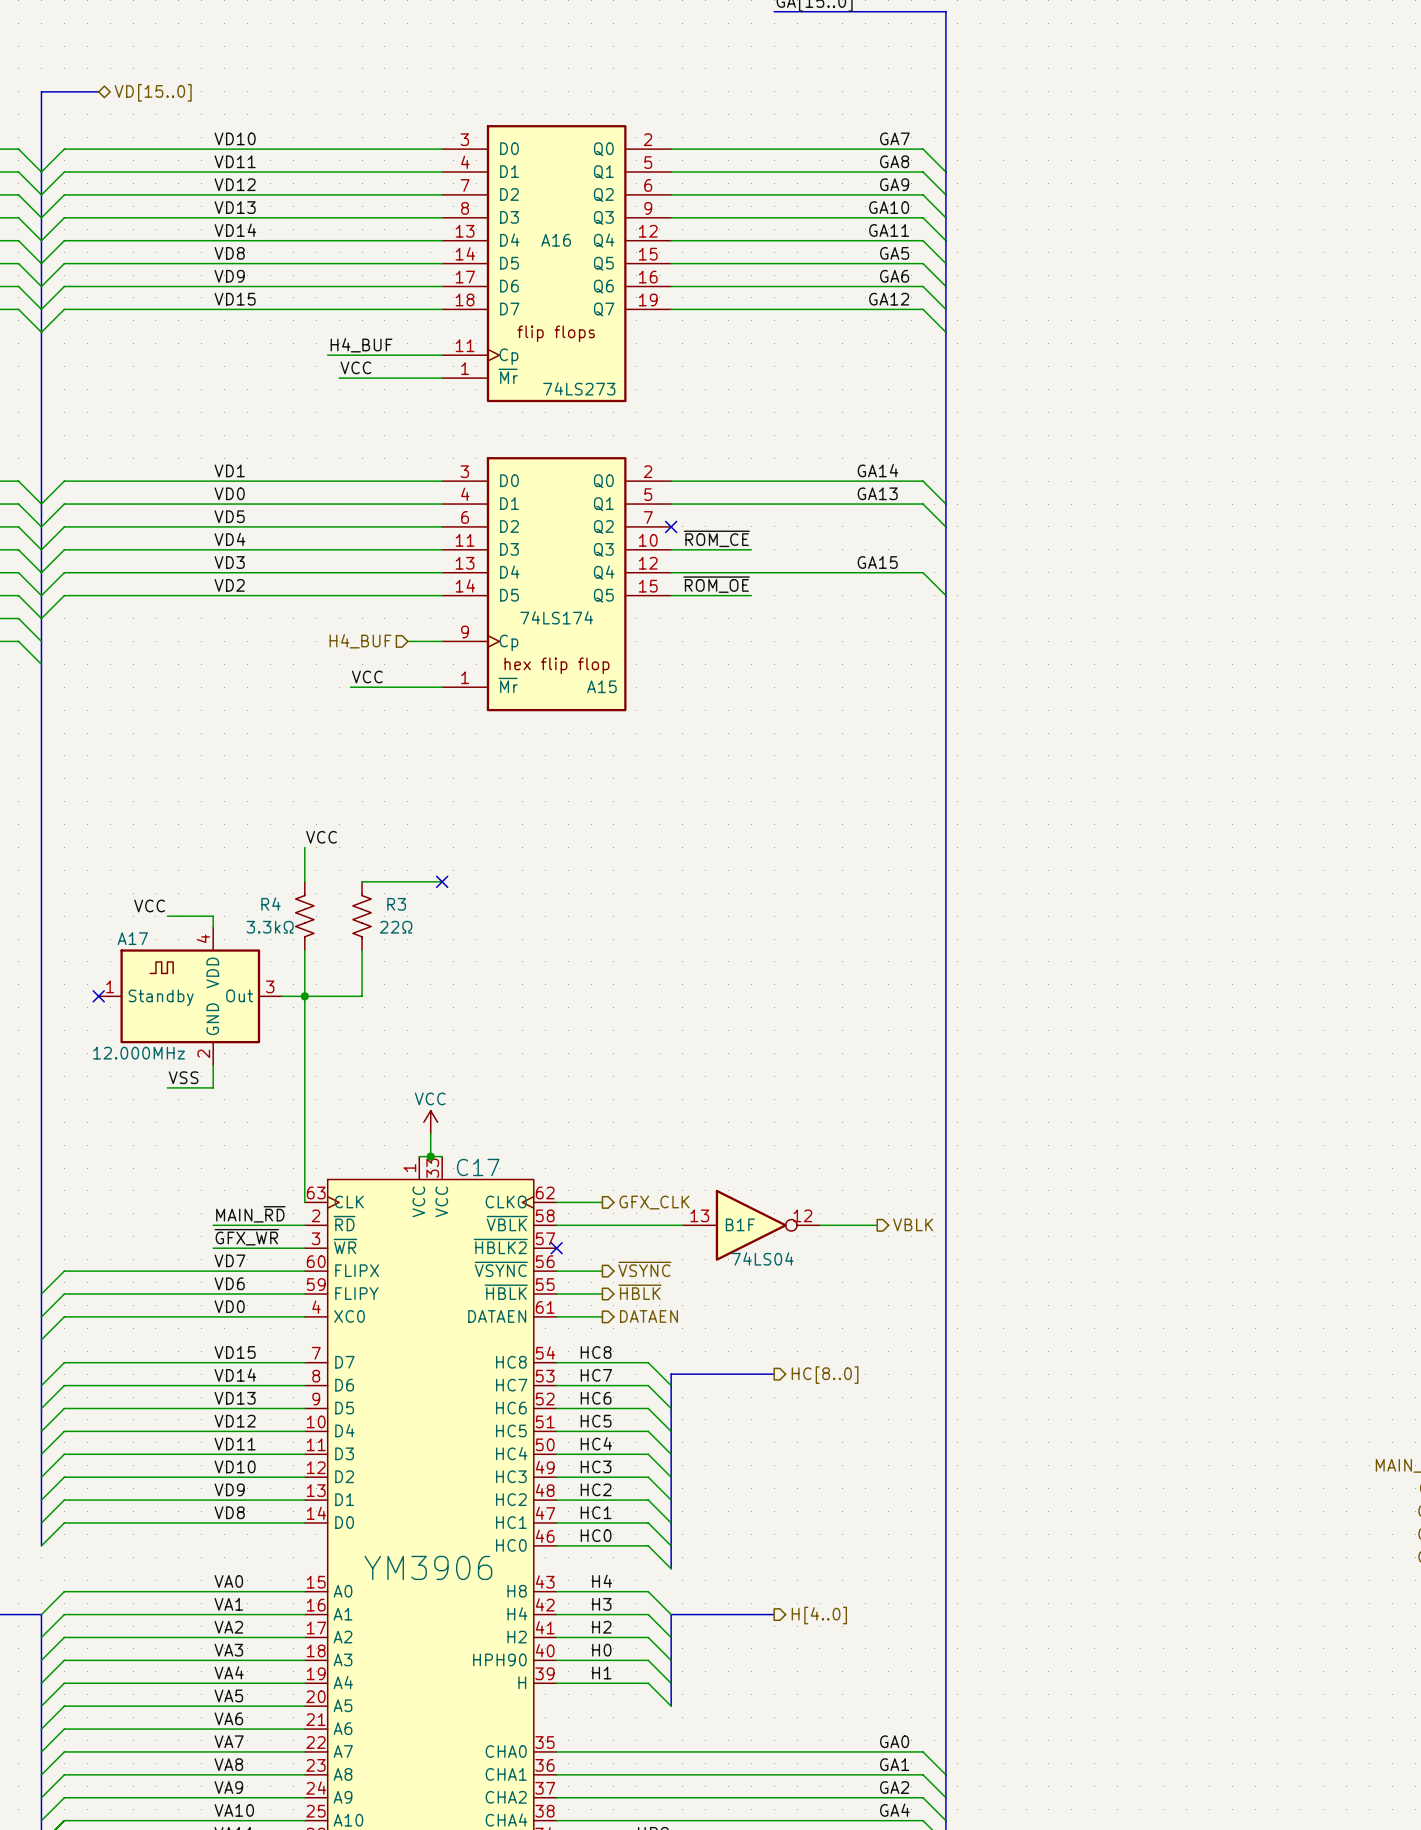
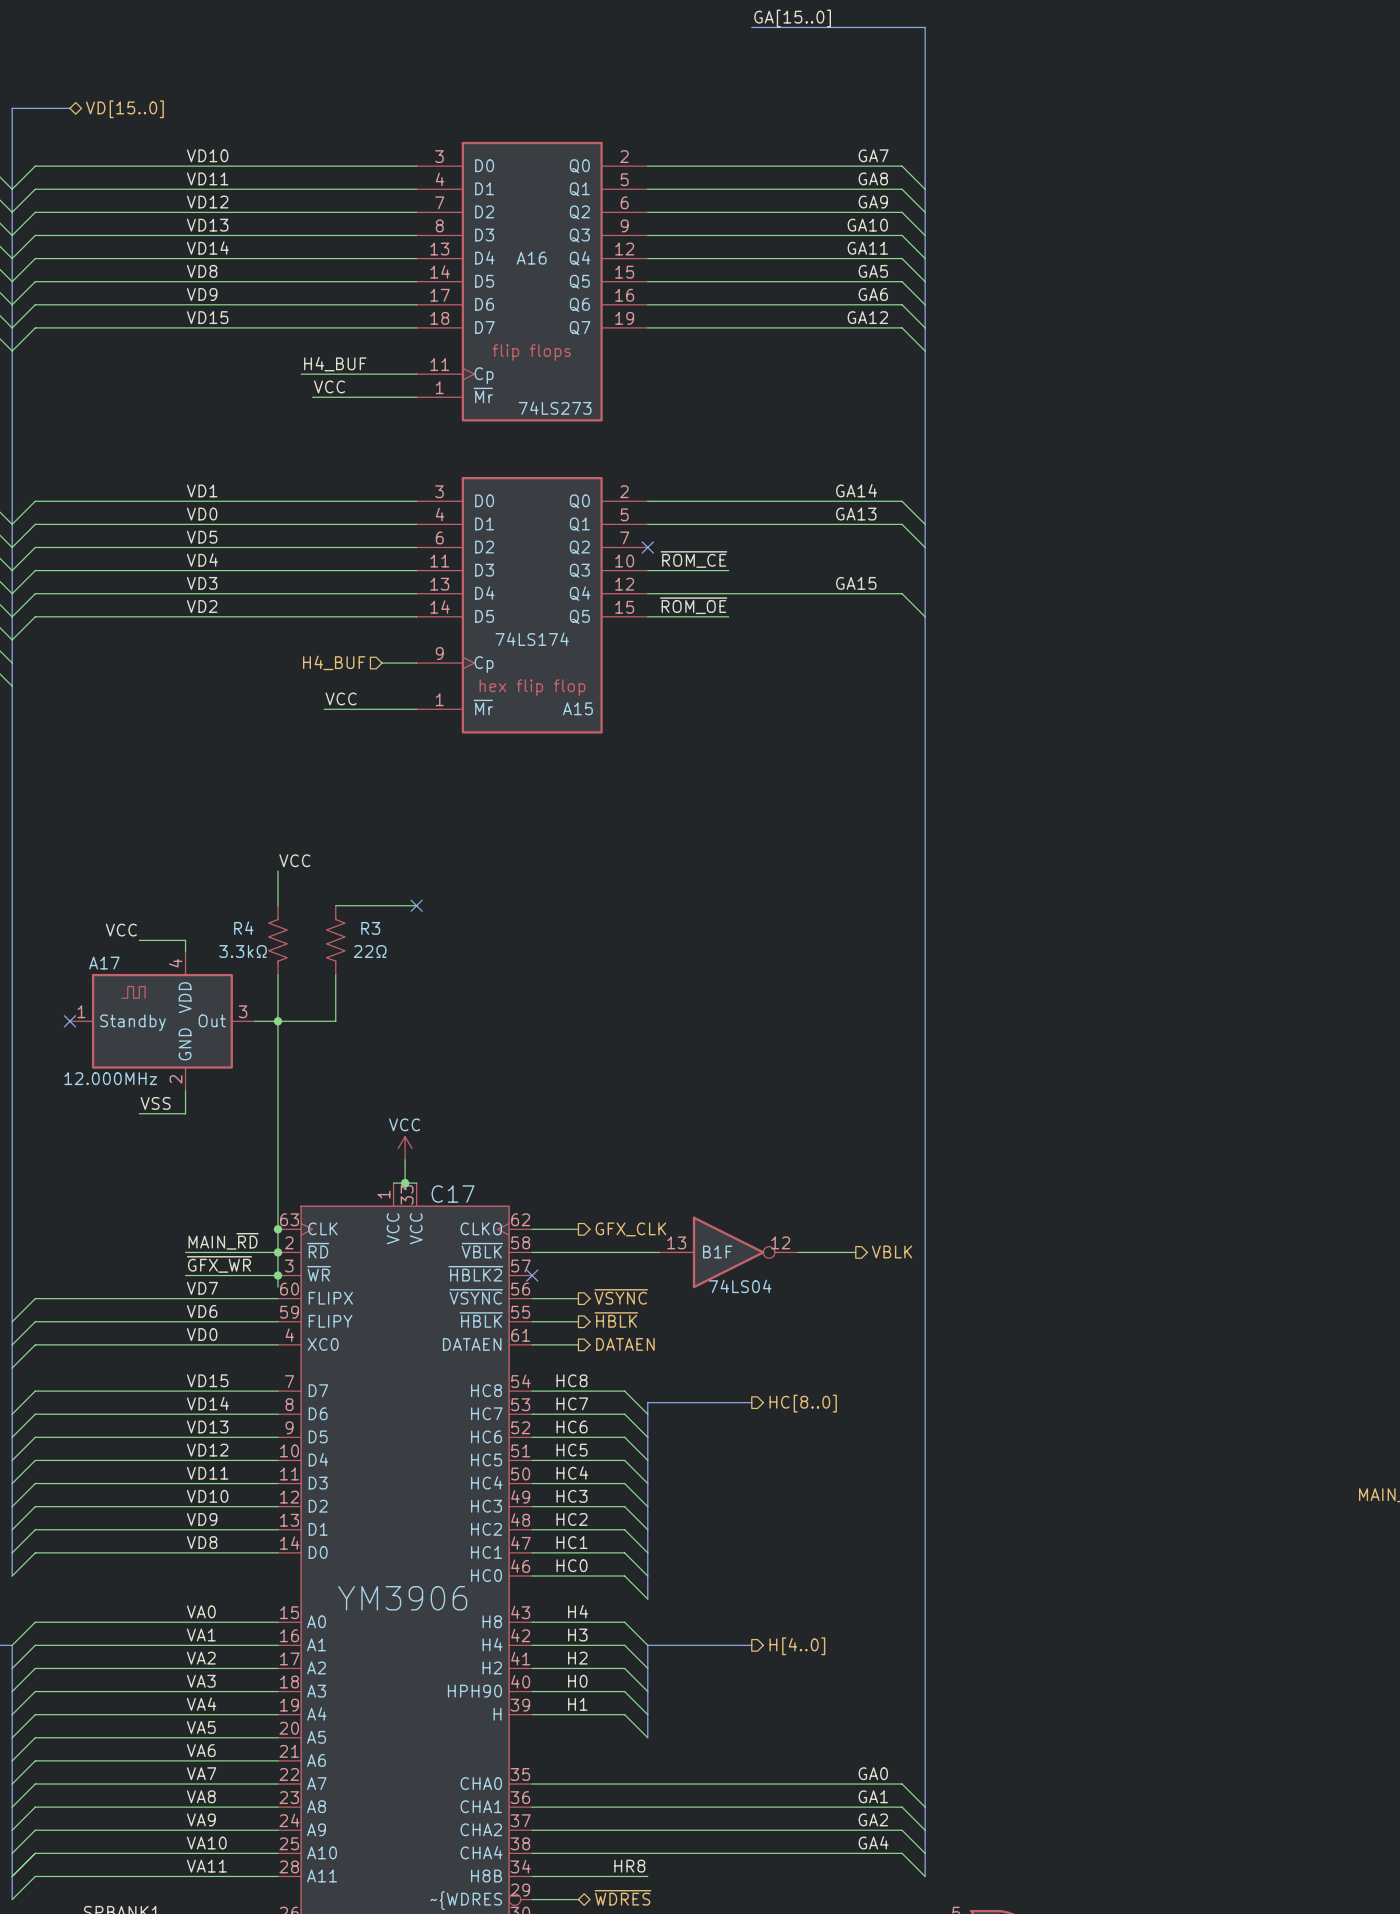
wire: none -> (277, 1229) (277, 1287)
junction: none -> (277, 1229)
junction: none -> (277, 1252)
junction: none -> (277, 1275)

